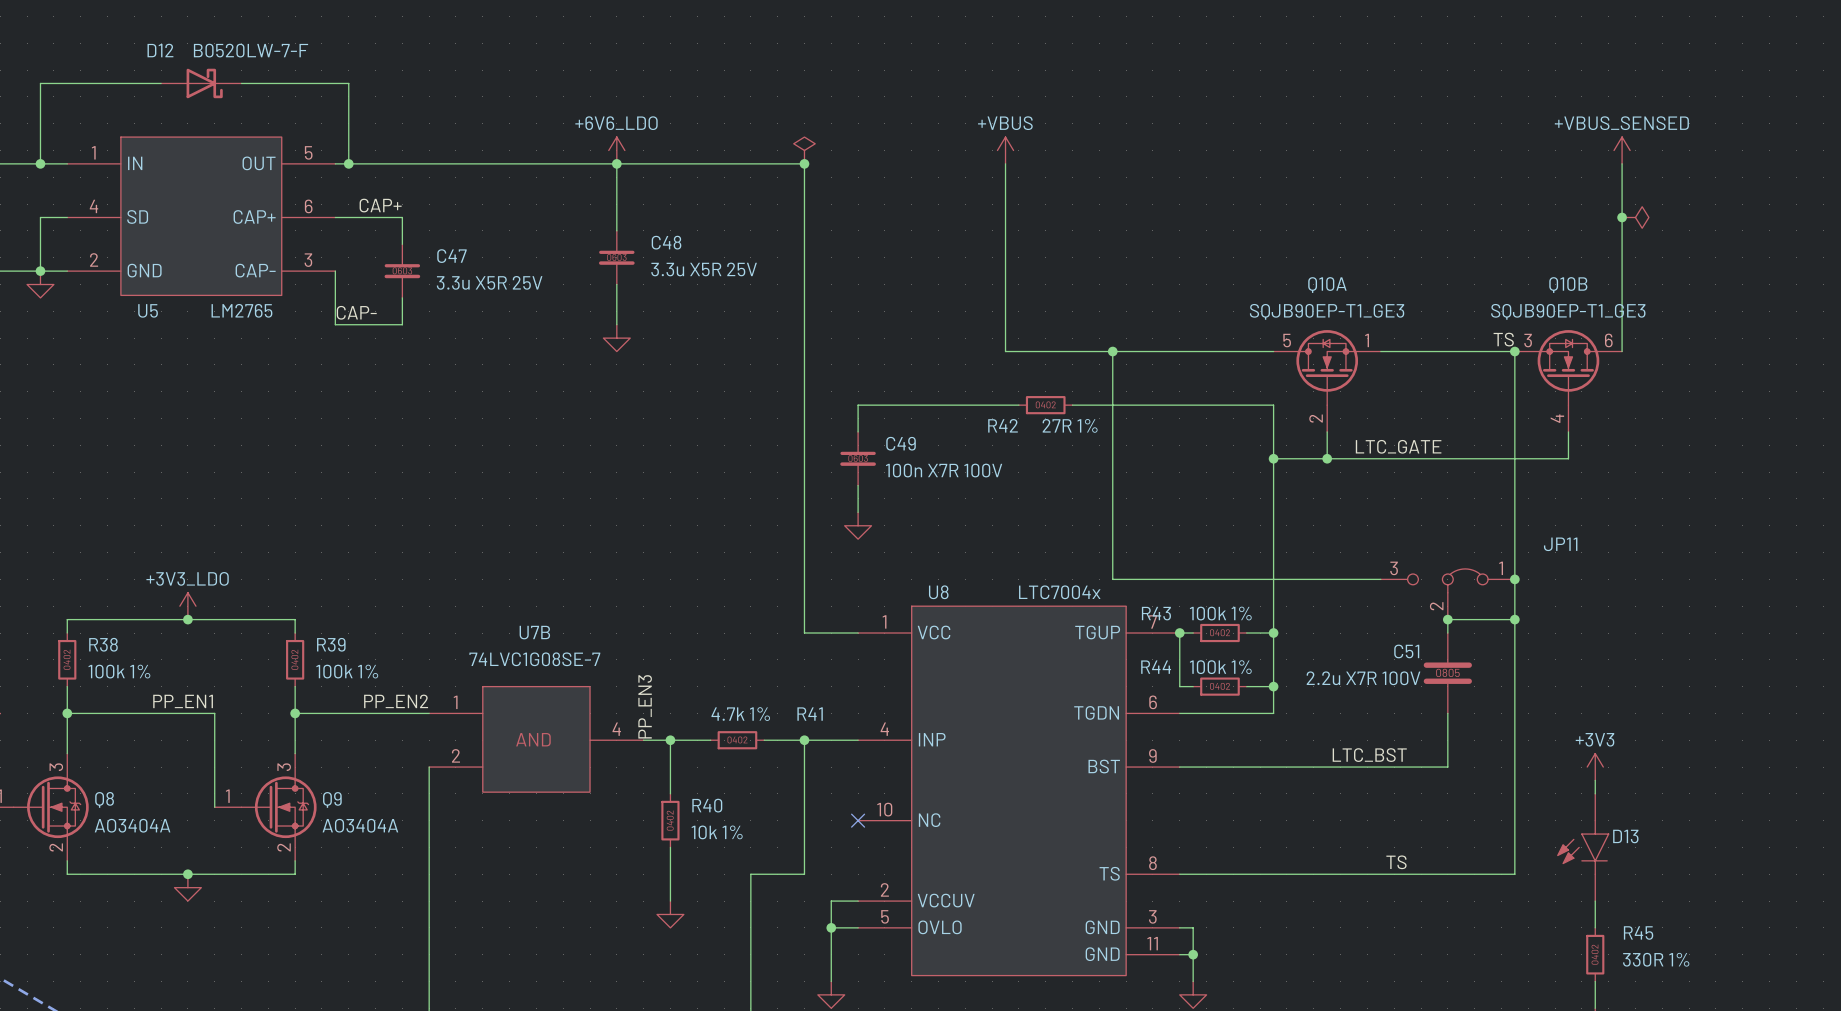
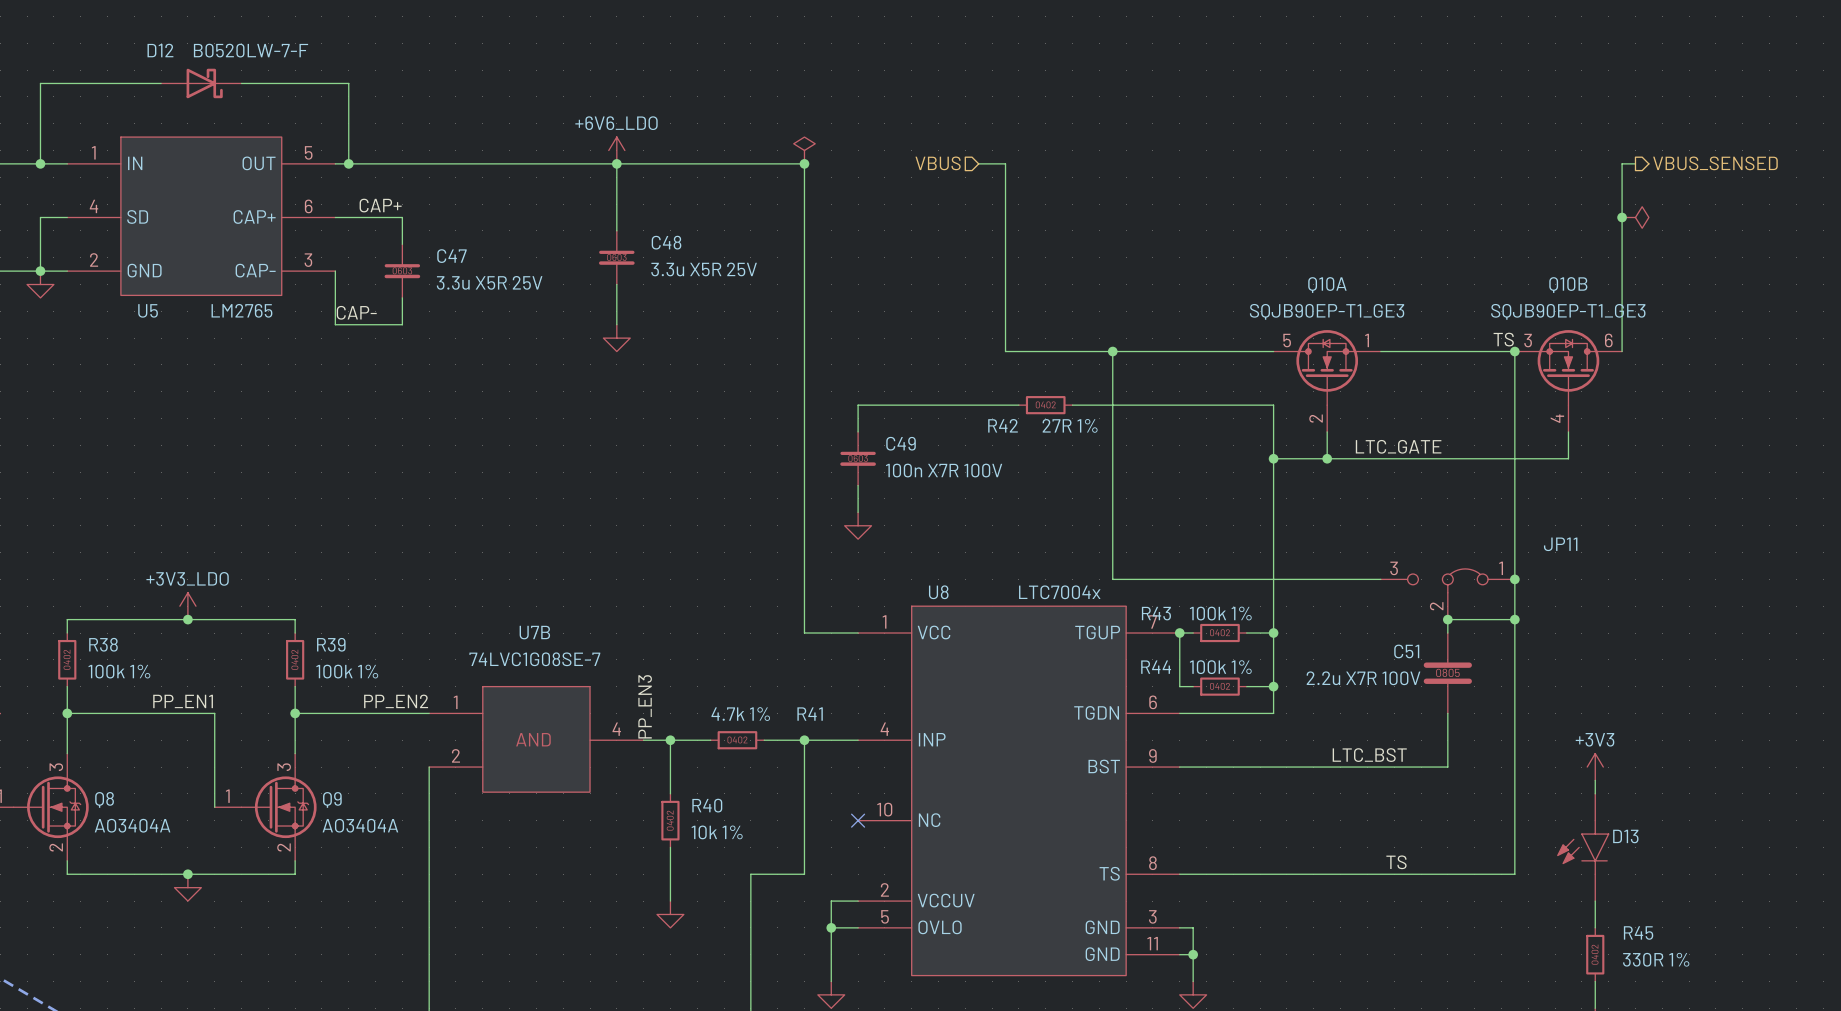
power symbol: +VBUS (1005, 150) -> none
power symbol: +VBUS_SENSED (1622, 150) -> none
hierarchical label: none -> VBUS (938, 163)
wire: none -> (978, 163) (1005, 163)
wire: none -> (1622, 163) (1635, 163)
hierarchical label: none -> VBUS_SENSED (1715, 163)

